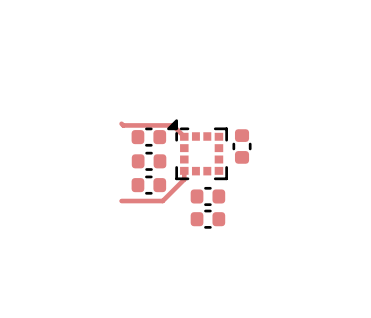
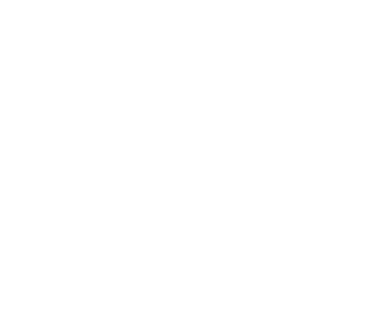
track: (121, 123) (123, 125) (172, 125) (184, 136) -> none
part: (148, 137) -> none
part: (242, 146) -> none
part: (197, 149) -> none
part: (149, 161) -> none
track: (184, 170) (184, 179) (162, 201) (121, 201) -> none
part: (148, 185) -> none
part: (207, 196) -> none
part: (207, 219) -> none

